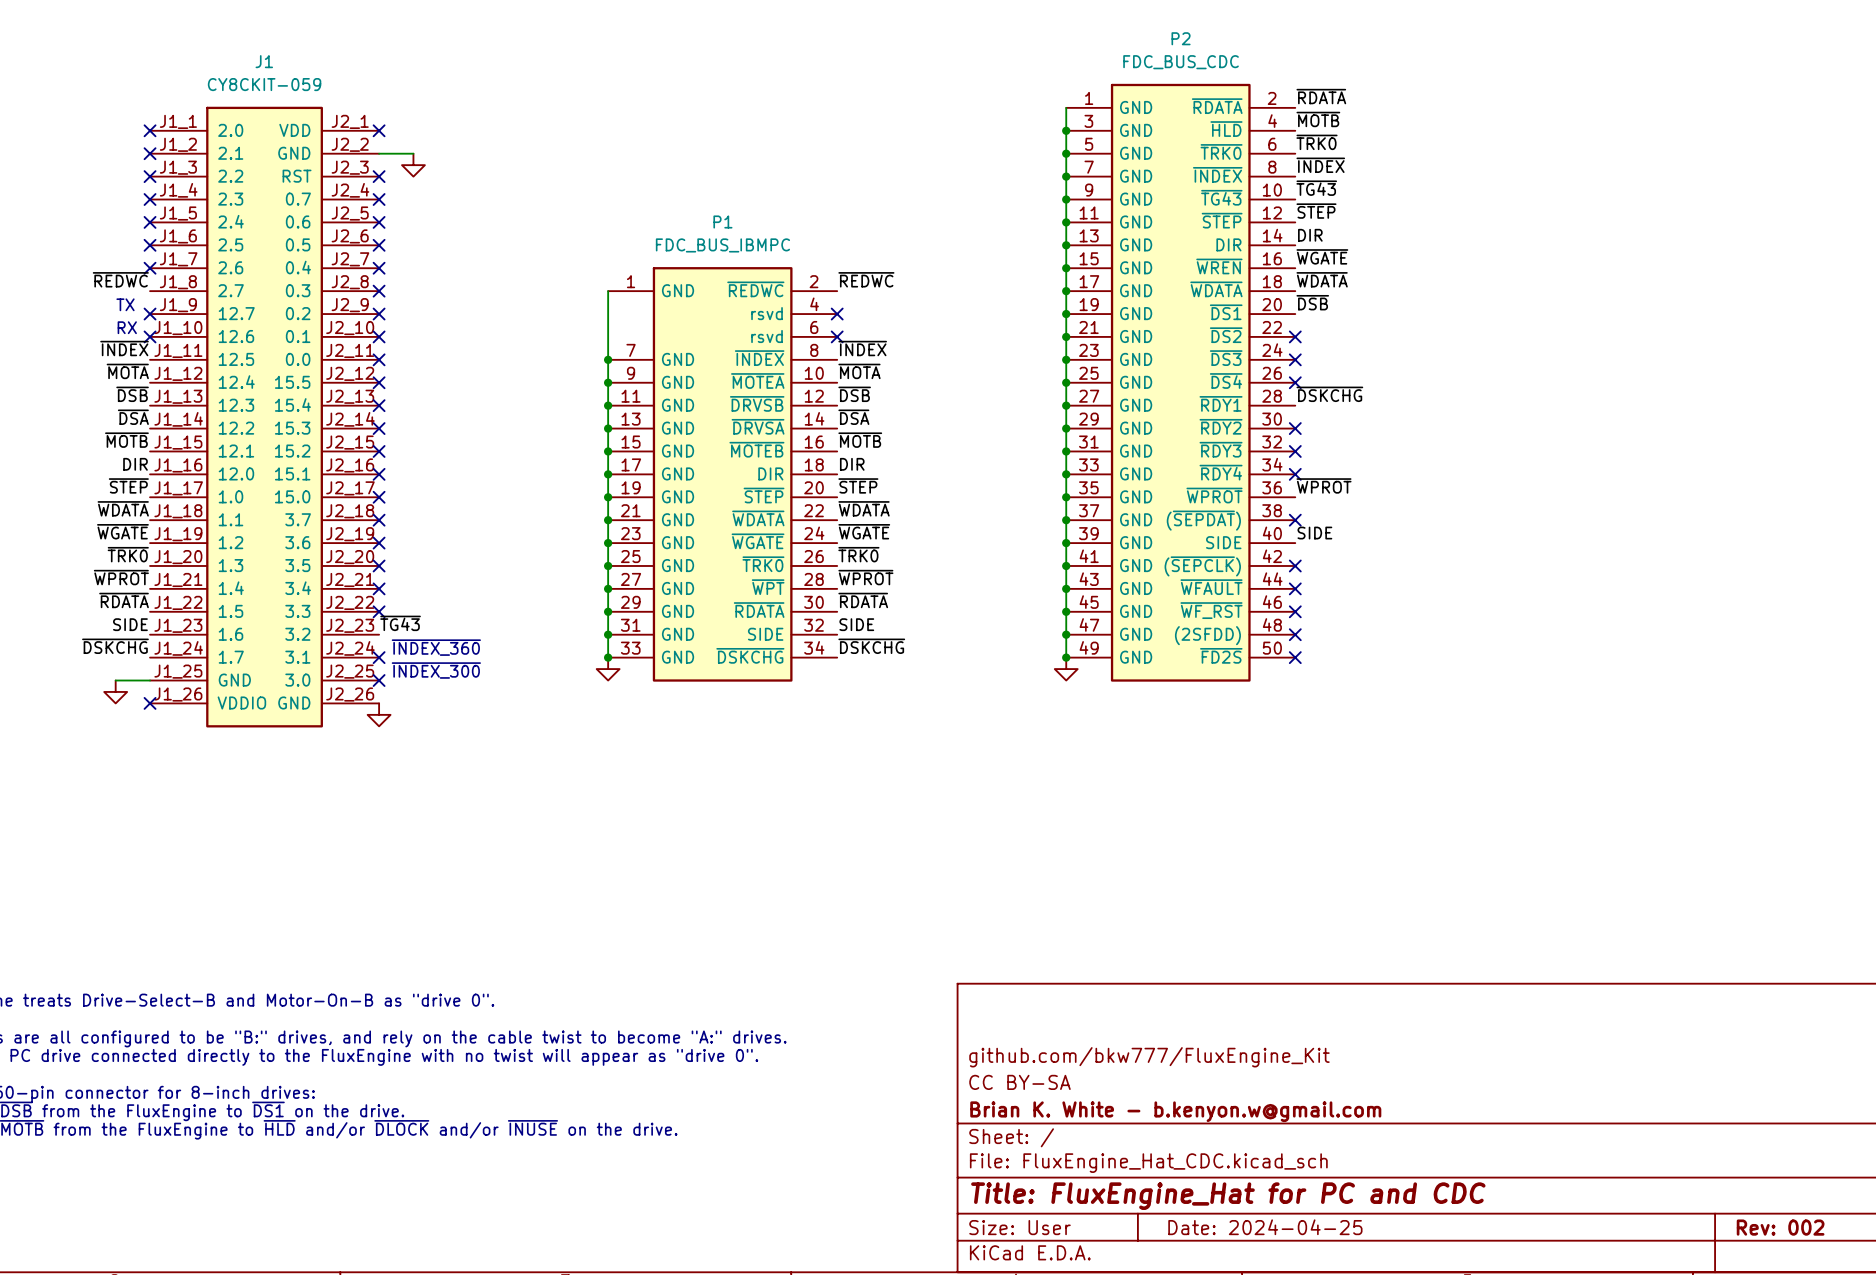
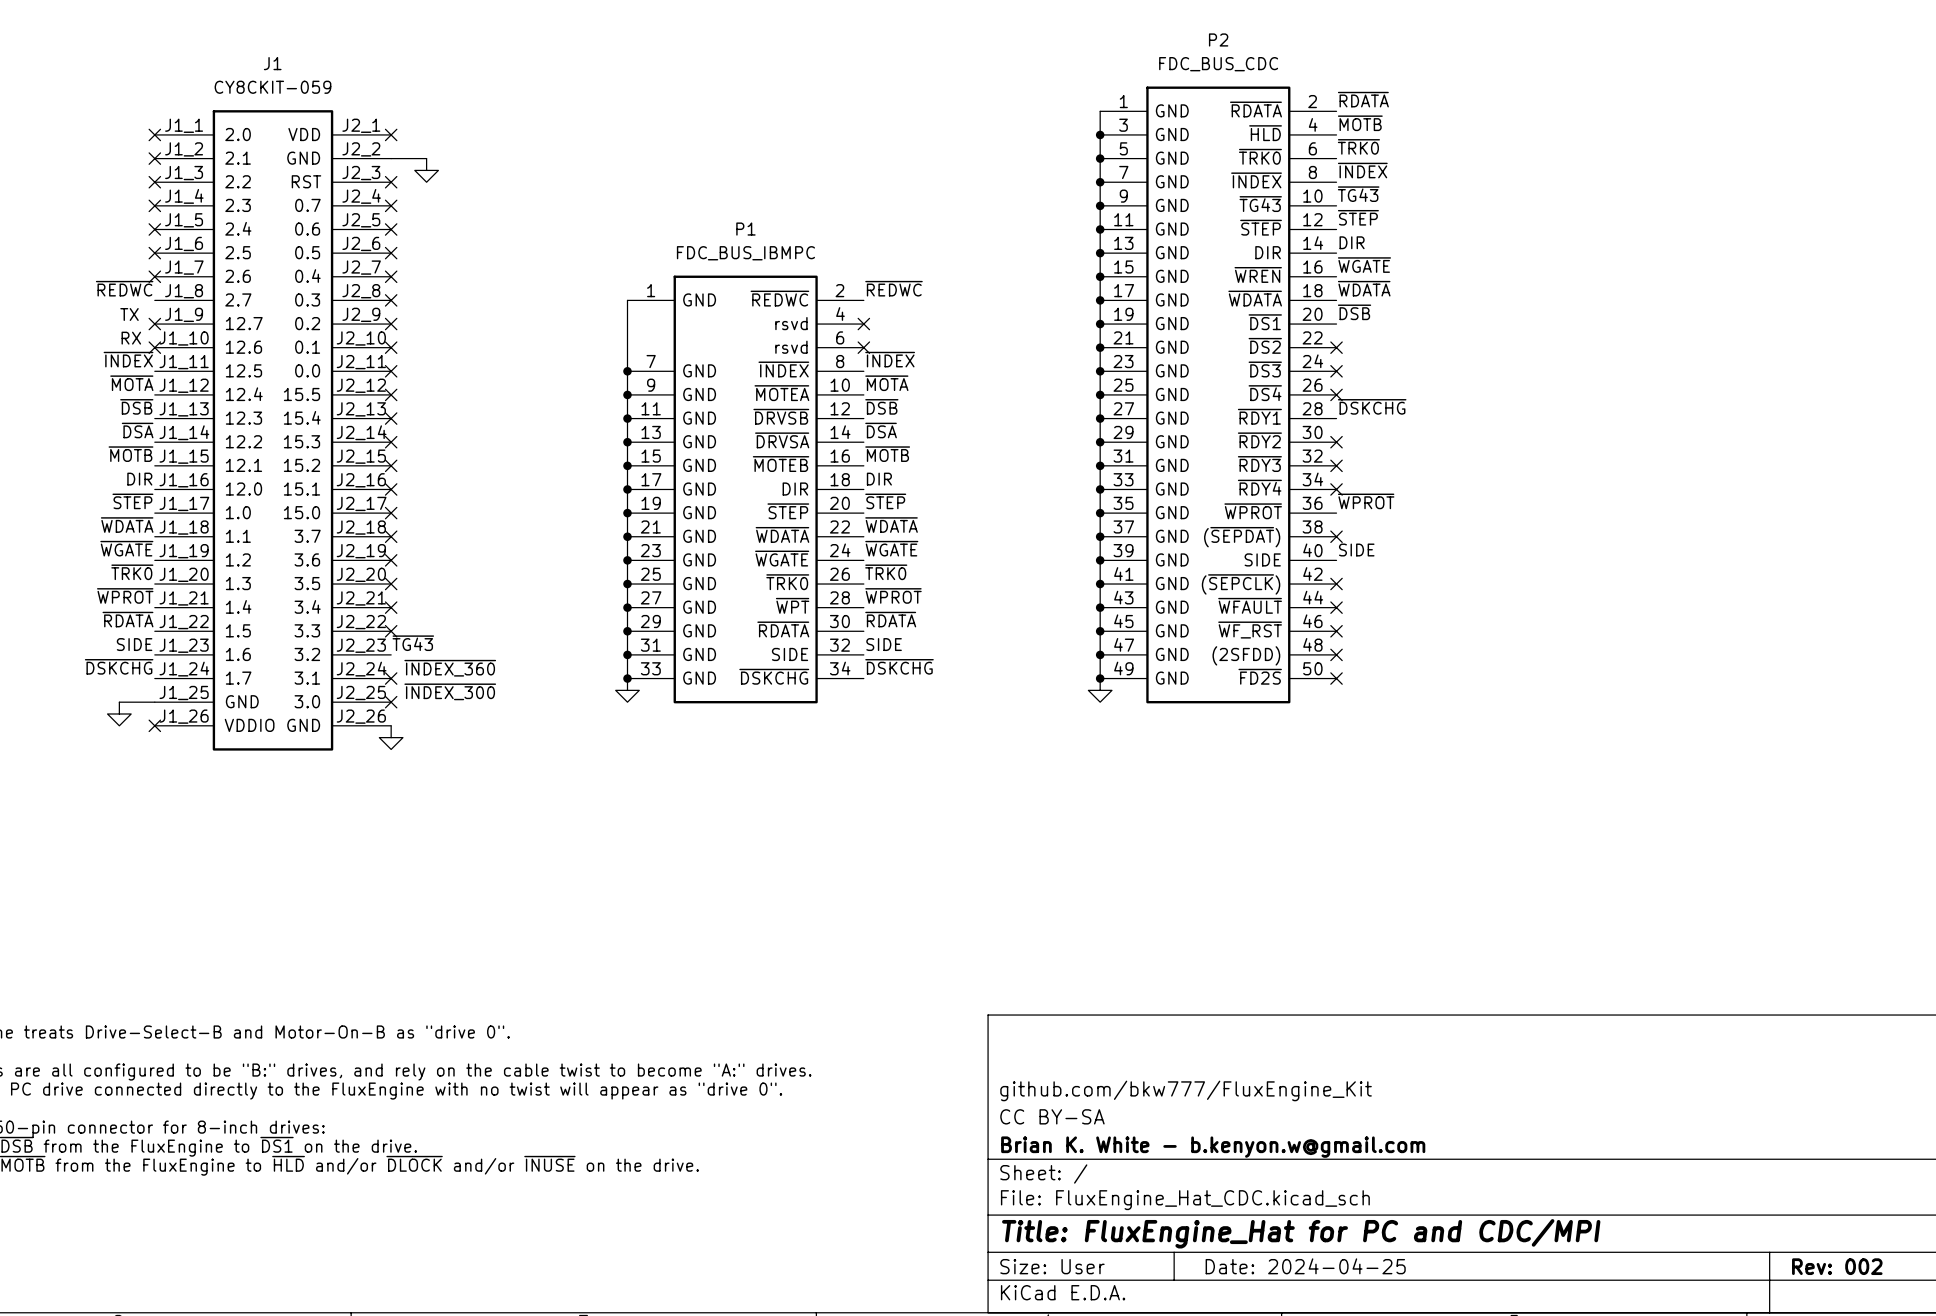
title block: Title: FluxEngine_Hat for PC and CDC (1228, 1196) -> Title: FluxEngine_Hat for PC and CDC/MPI (1301, 1233)

